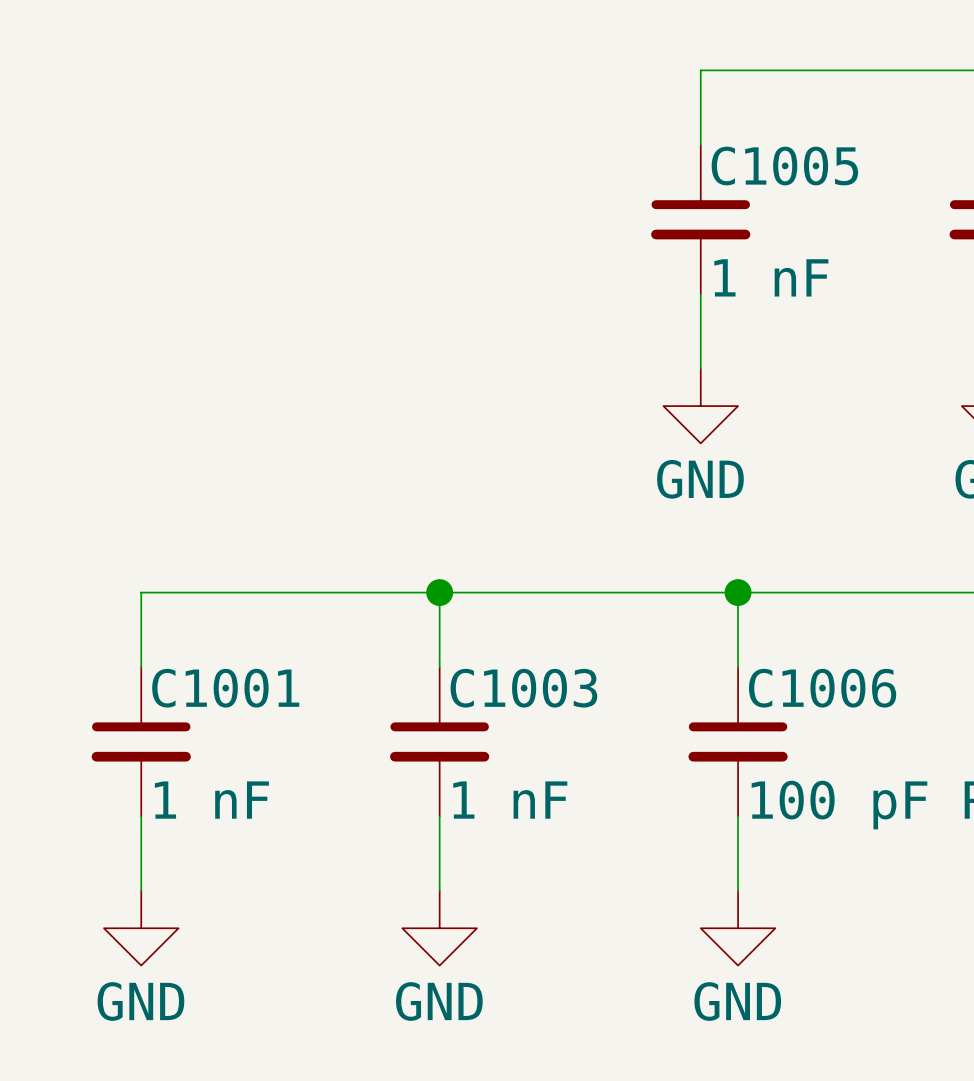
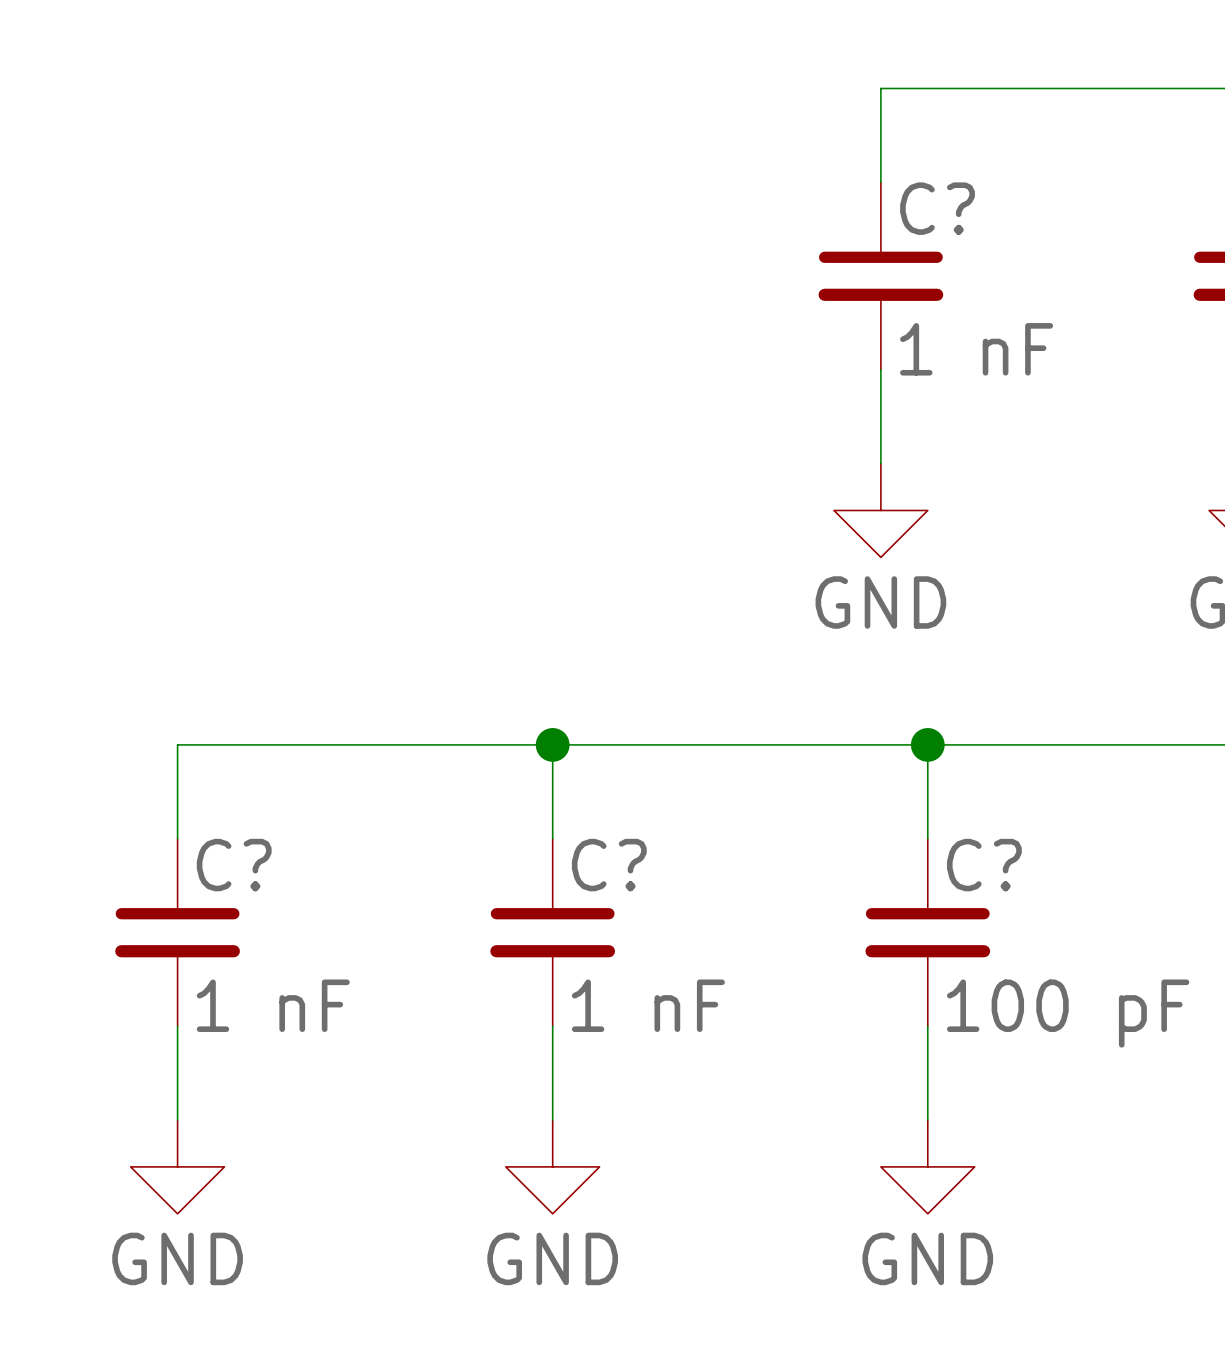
C1005 name: C1005 (784, 166) -> C? (937, 208)
C1001 name: C1001 (225, 688) -> C? (234, 865)
C1003 name: C1003 (523, 688) -> C? (609, 865)
C1006 name: C1006 (822, 688) -> C? (984, 865)

